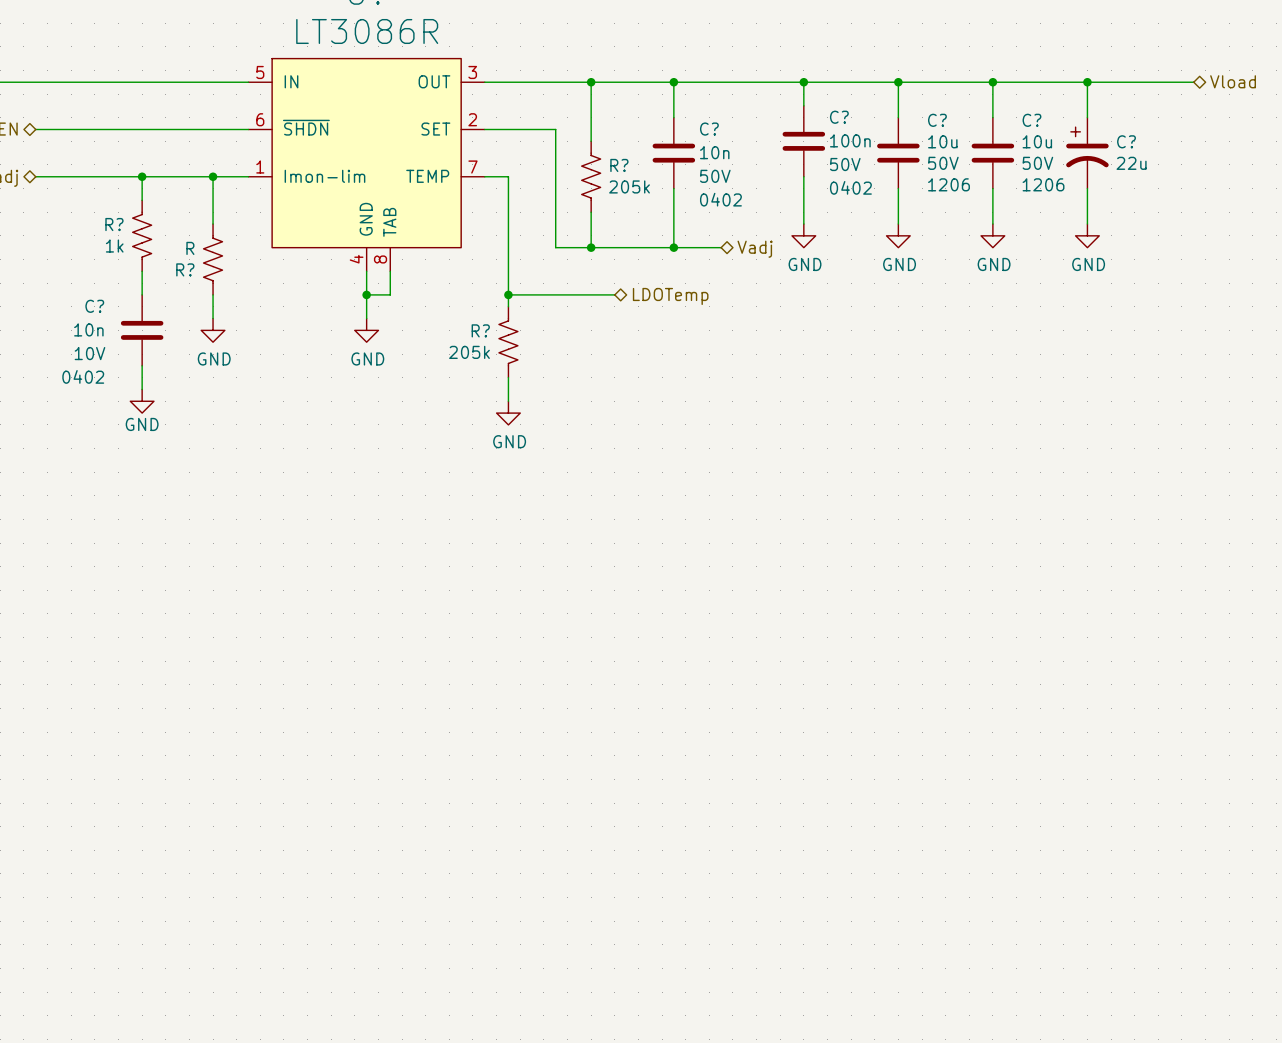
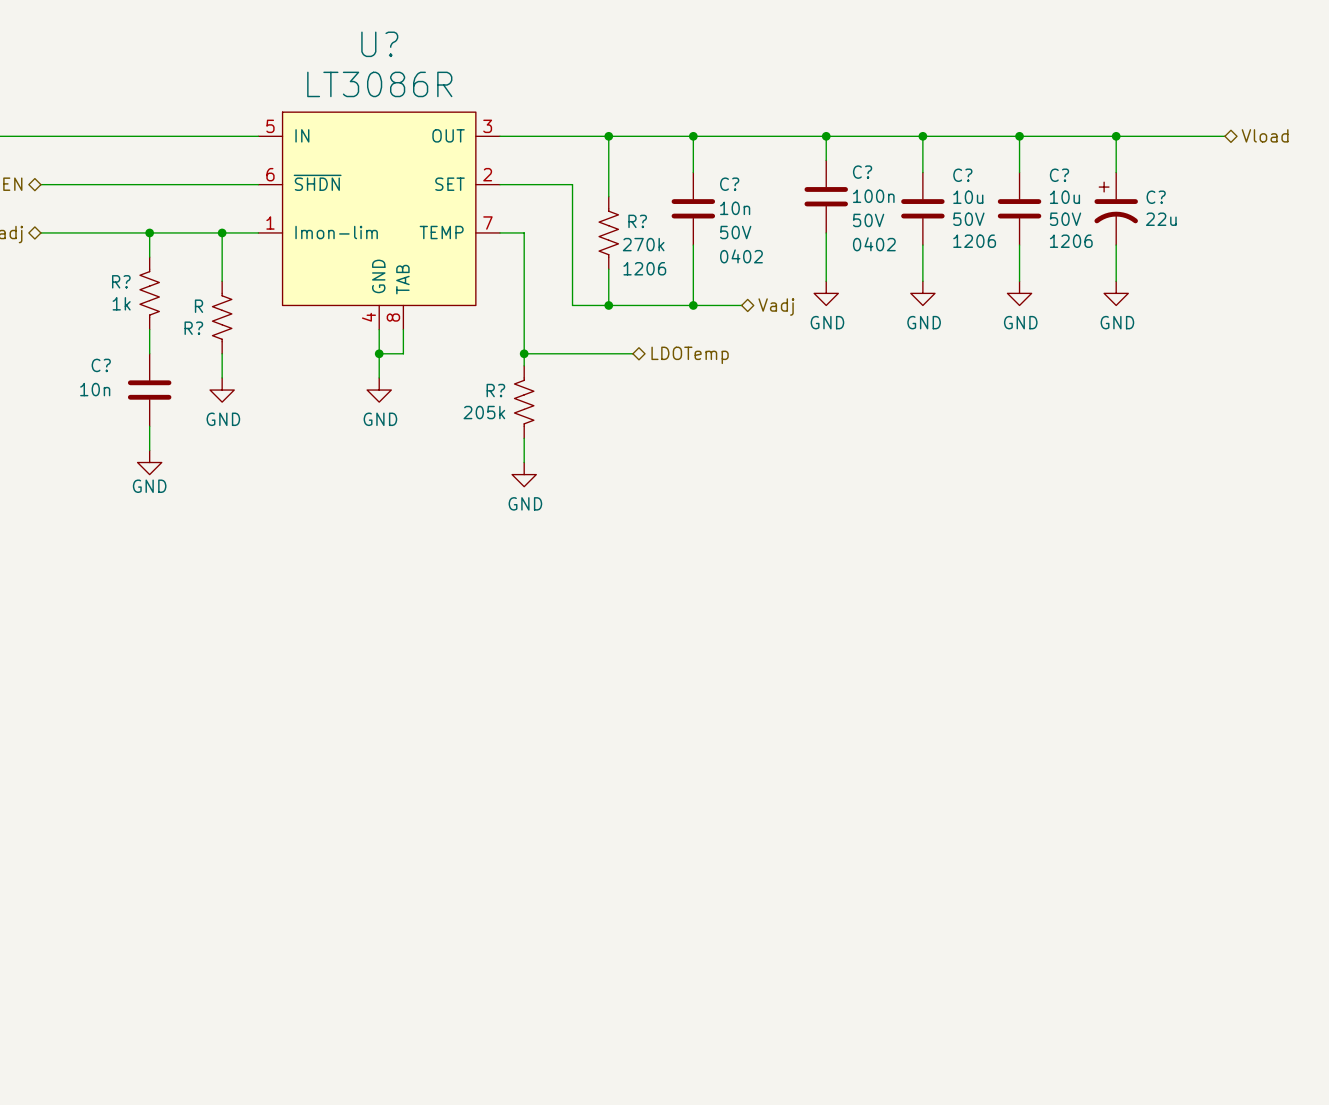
R? value: 205k (629, 186) -> 270k (643, 244)
R? text: none -> 1206 (644, 268)
C? text: 10V (89, 353) -> none
C? text: 0402 (83, 376) -> none

